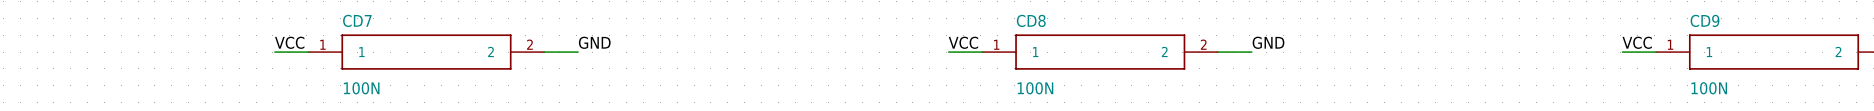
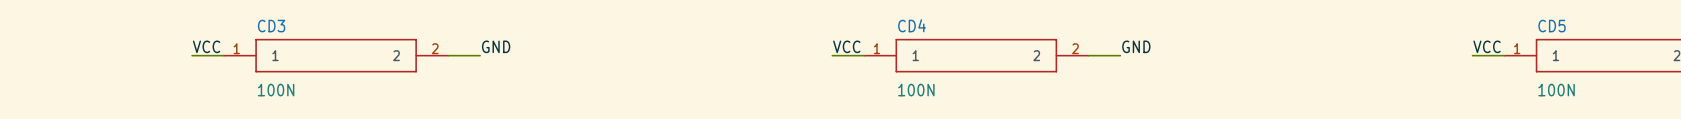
CD7 name: CD7 (357, 20) -> CD3 (271, 26)
CD8 name: CD8 (1031, 20) -> CD4 (912, 25)
CD9 name: CD9 (1705, 20) -> CD5 (1552, 26)

